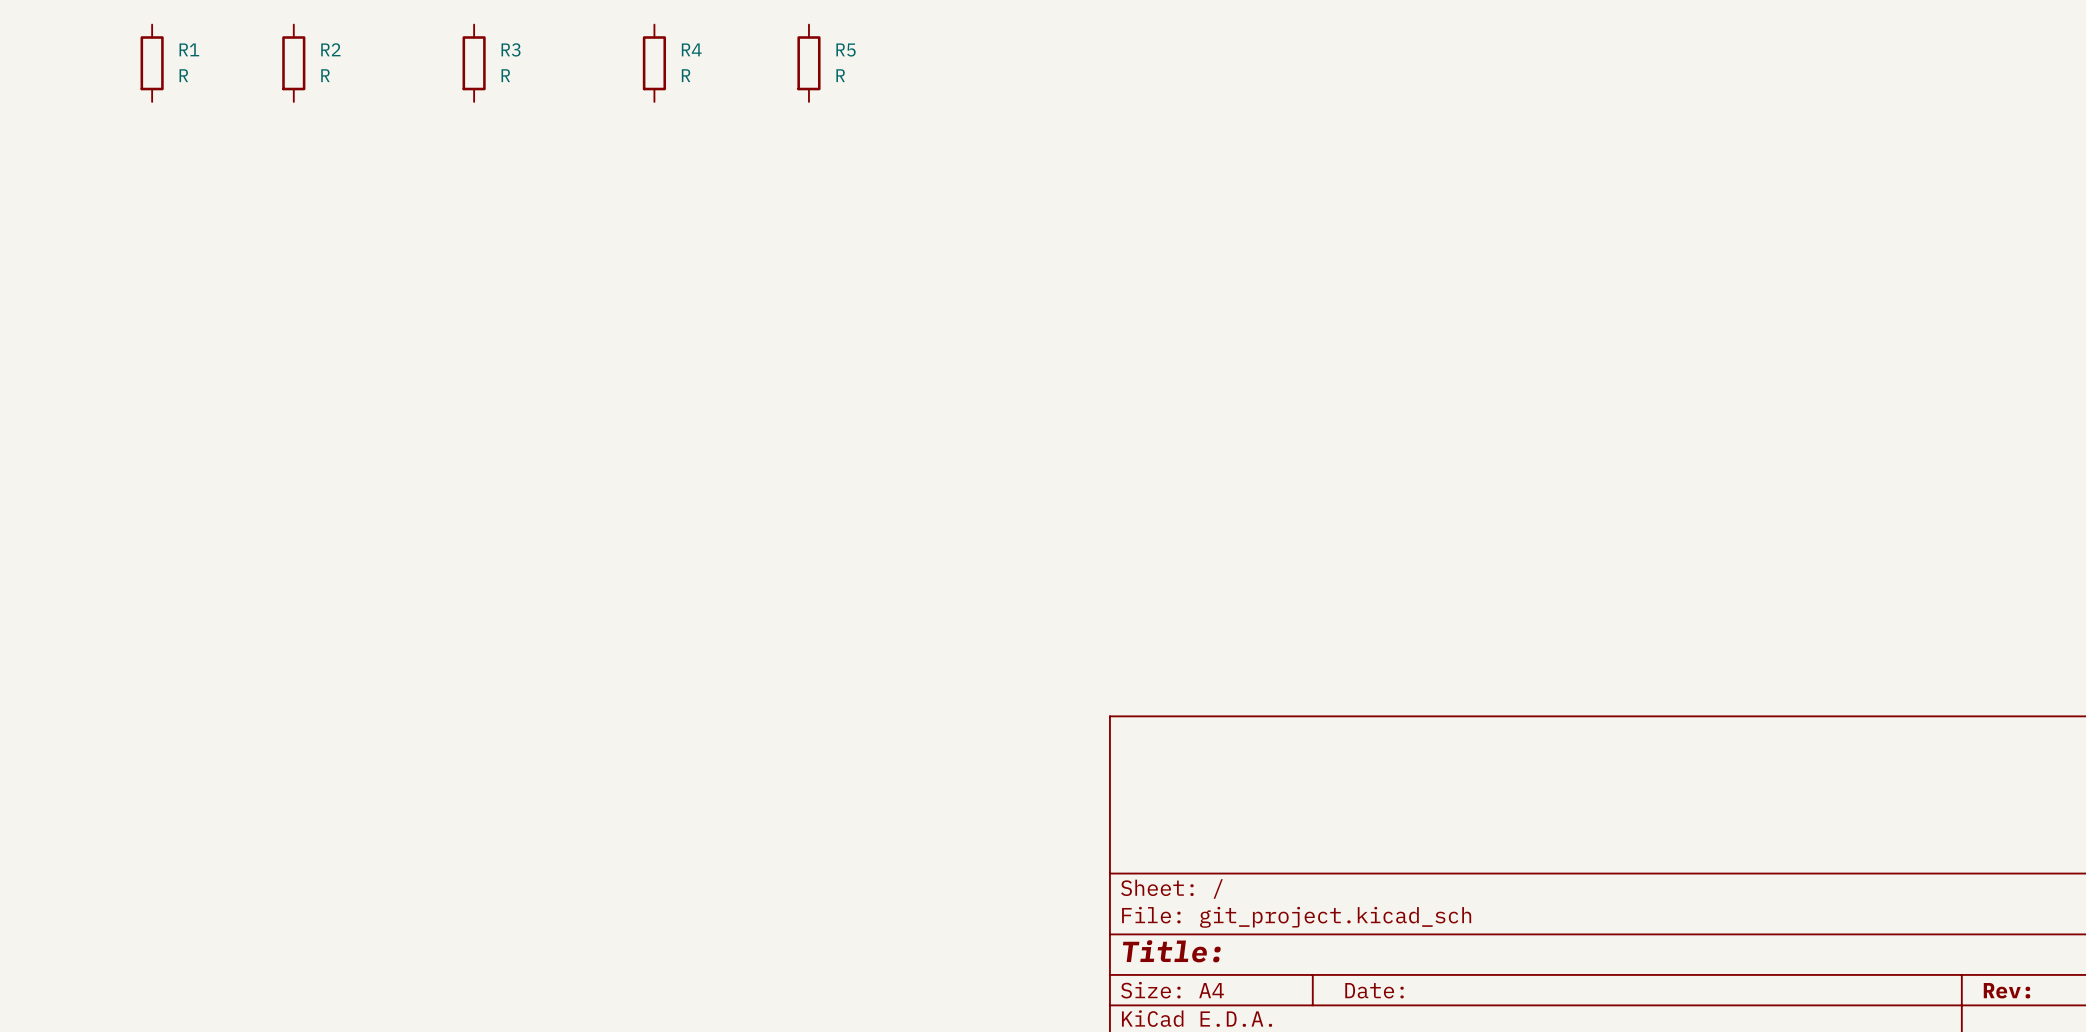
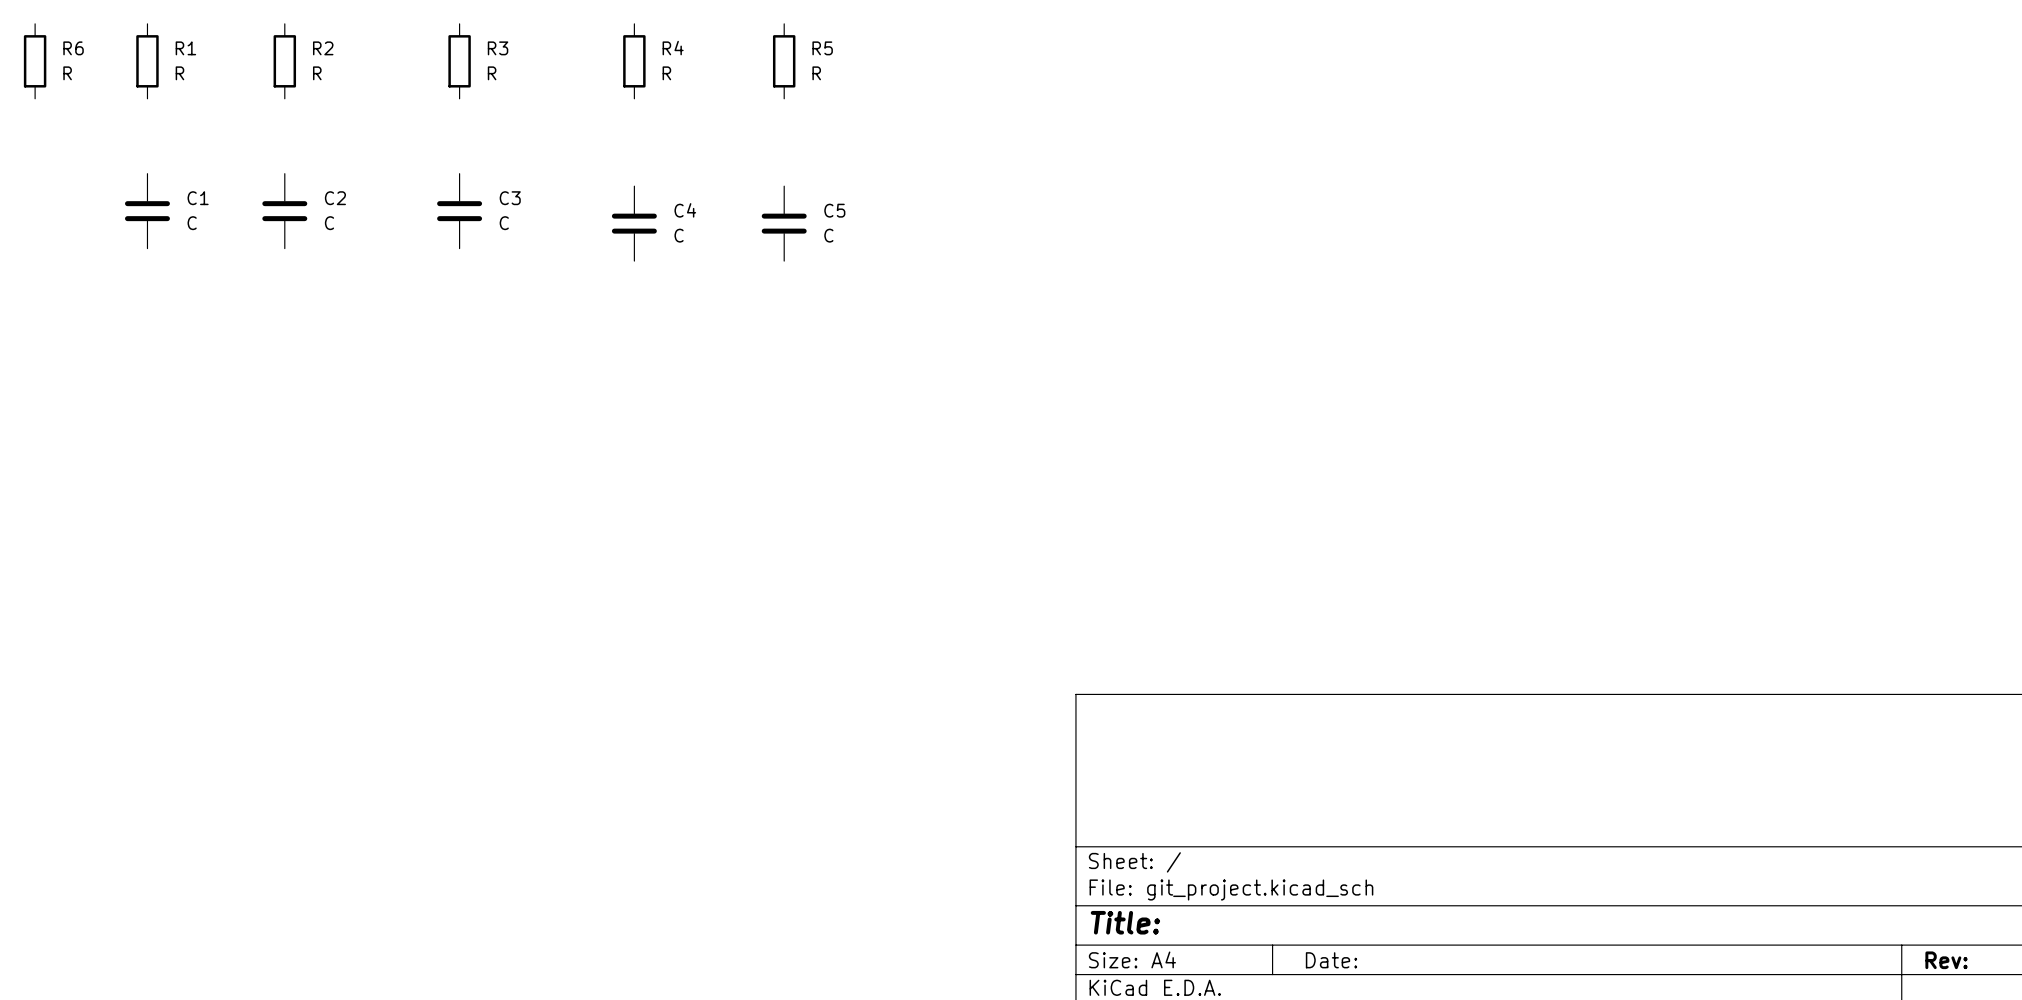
R6: none -> R (35, 61)
C1: none -> C (147, 211)
C2: none -> C (284, 211)
C3: none -> C (459, 211)
C4: none -> C (634, 223)
C5: none -> C (784, 223)

